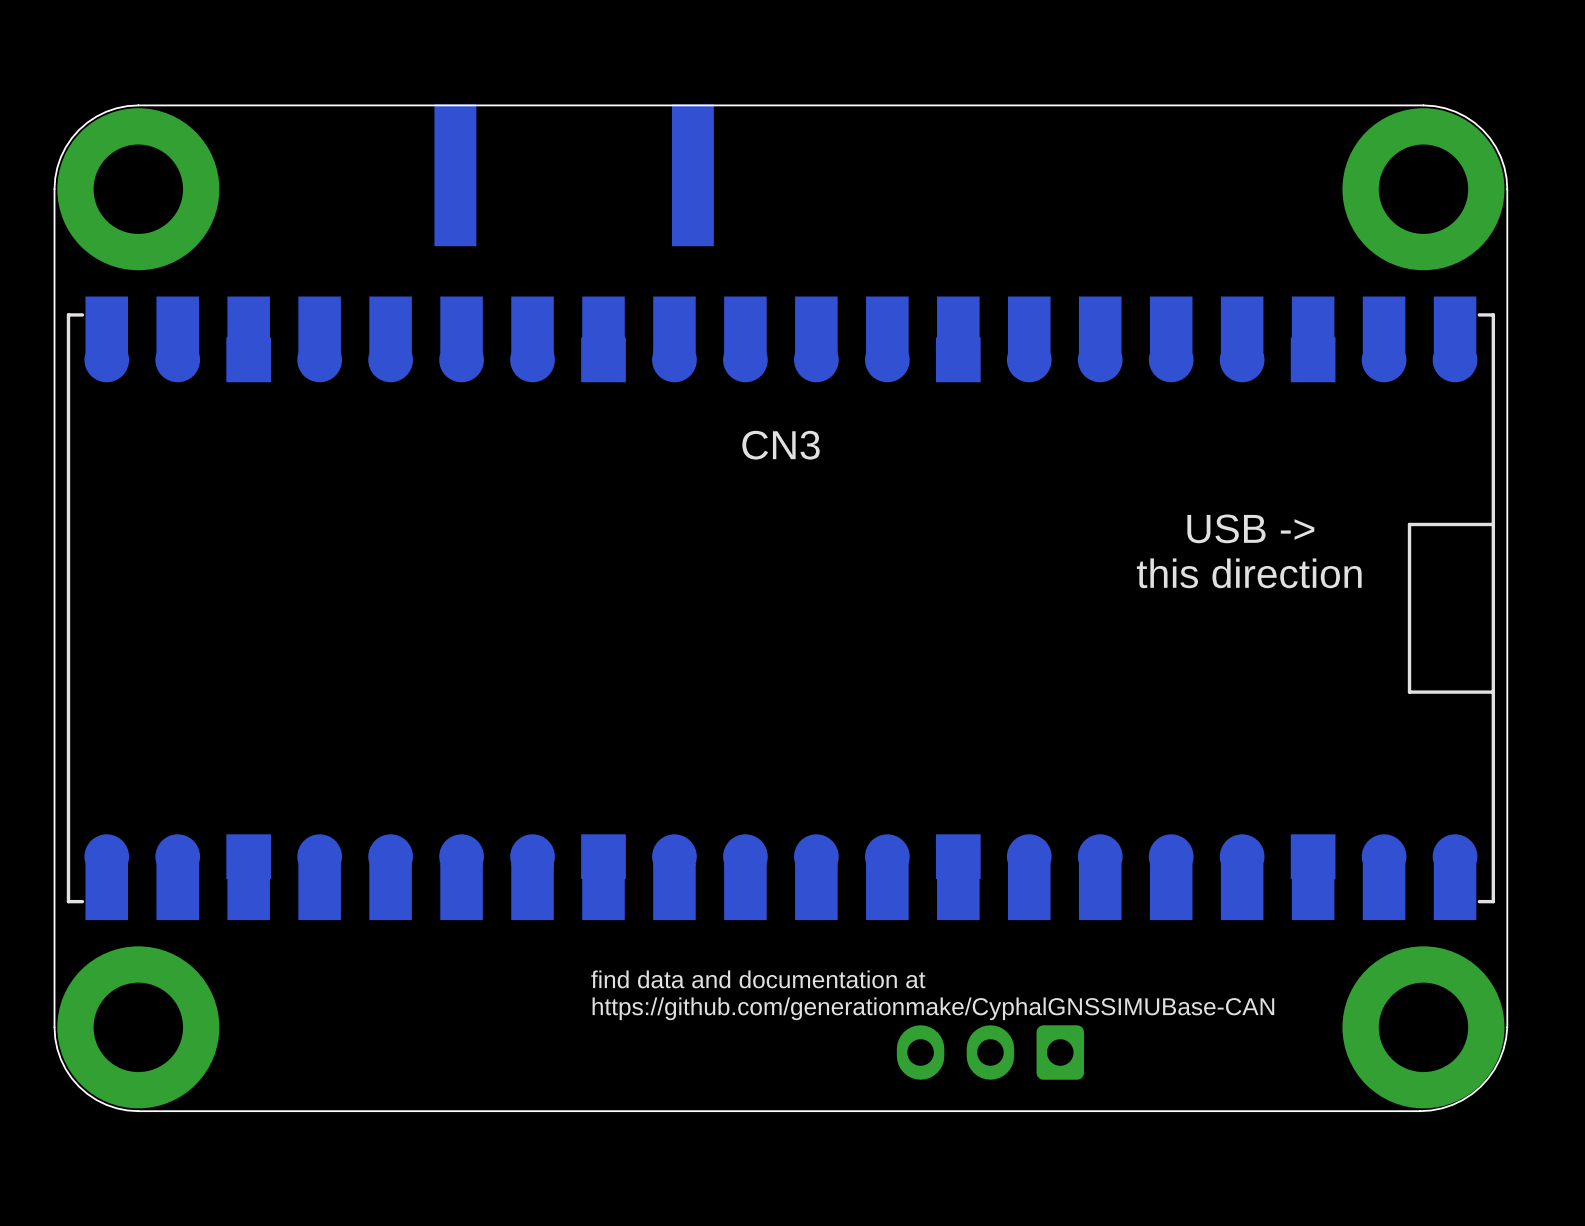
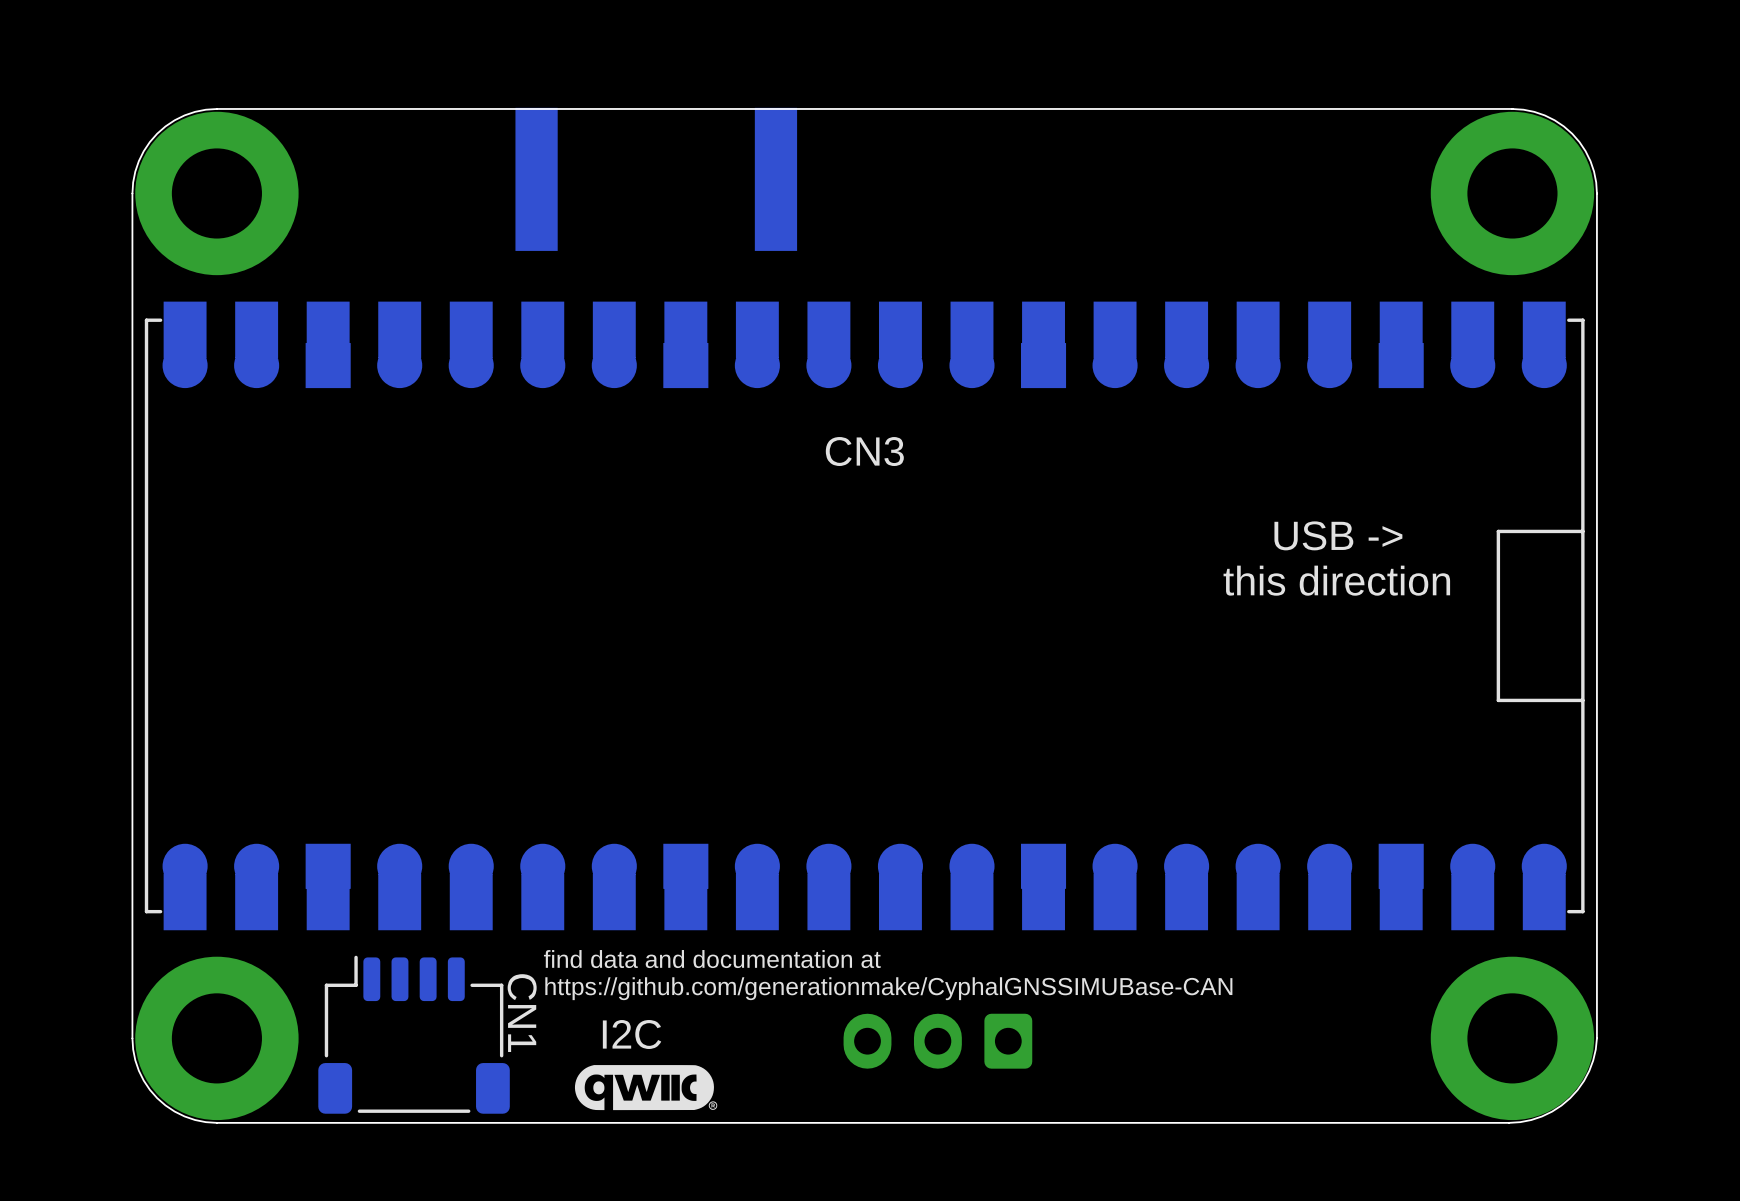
text position: find data and documentation at (758, 979) -> find data and documentation at (712, 959)
text position: https://github.com/generationmake/CyphalGNSSIMUBase-CAN (933, 1008) -> https://github.com/generationmake/CyphalGNSSIMUBase-CAN (888, 988)
CN1: none -> (414, 1034)
text: none -> I2C (632, 1034)
part position: (990, 1052) -> (937, 1041)
drawing: none -> [574, 1065, 718, 1111]

